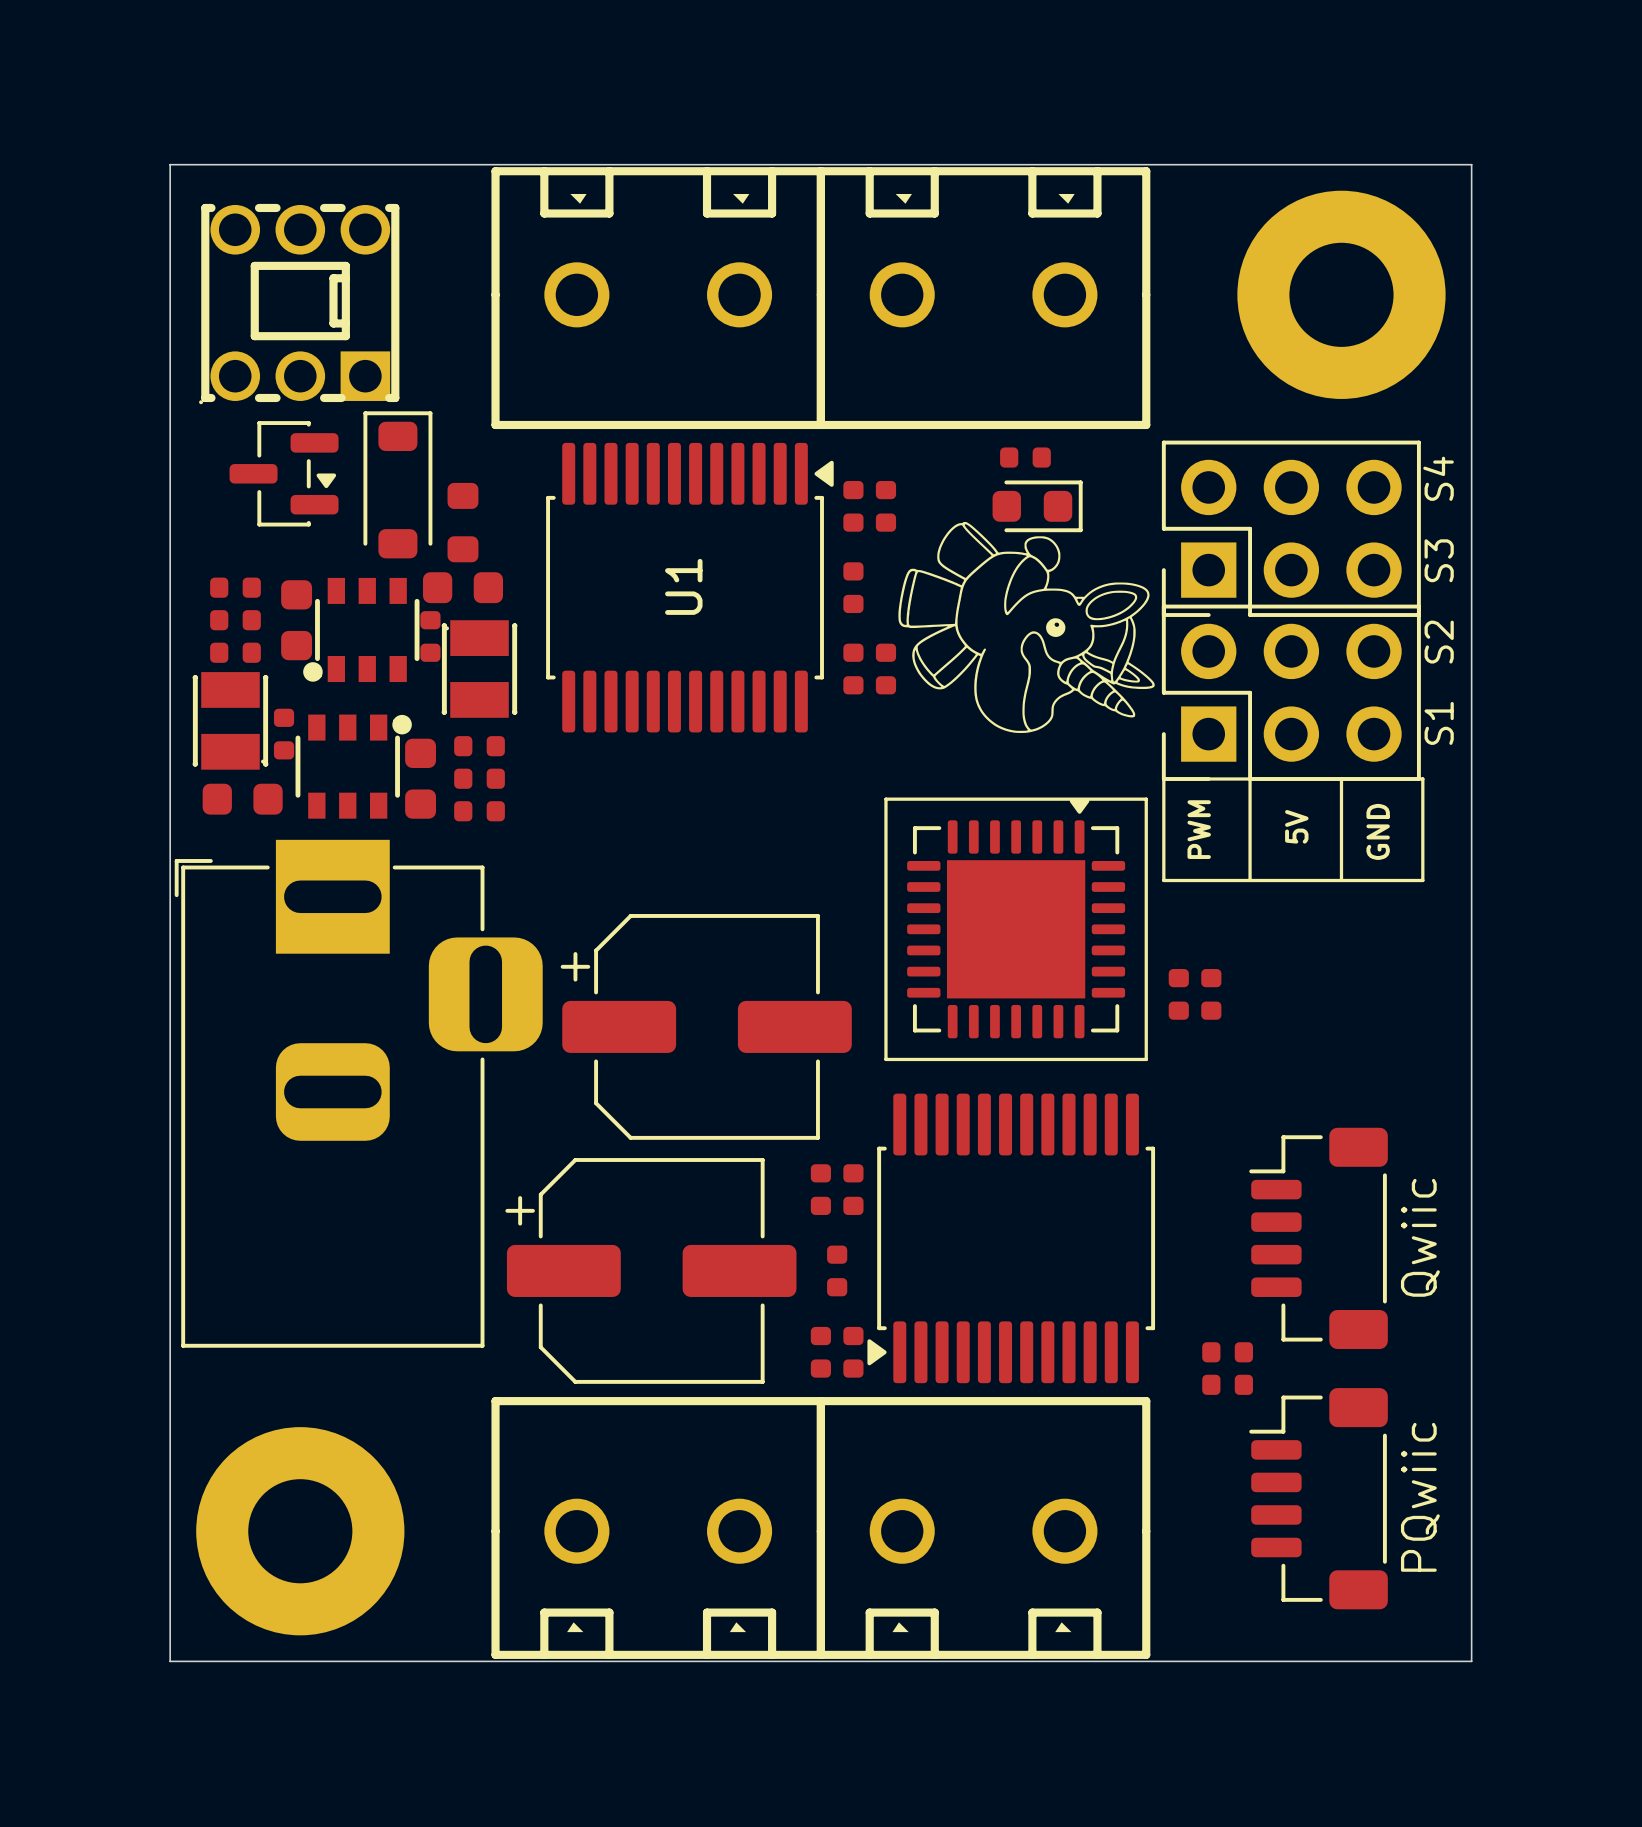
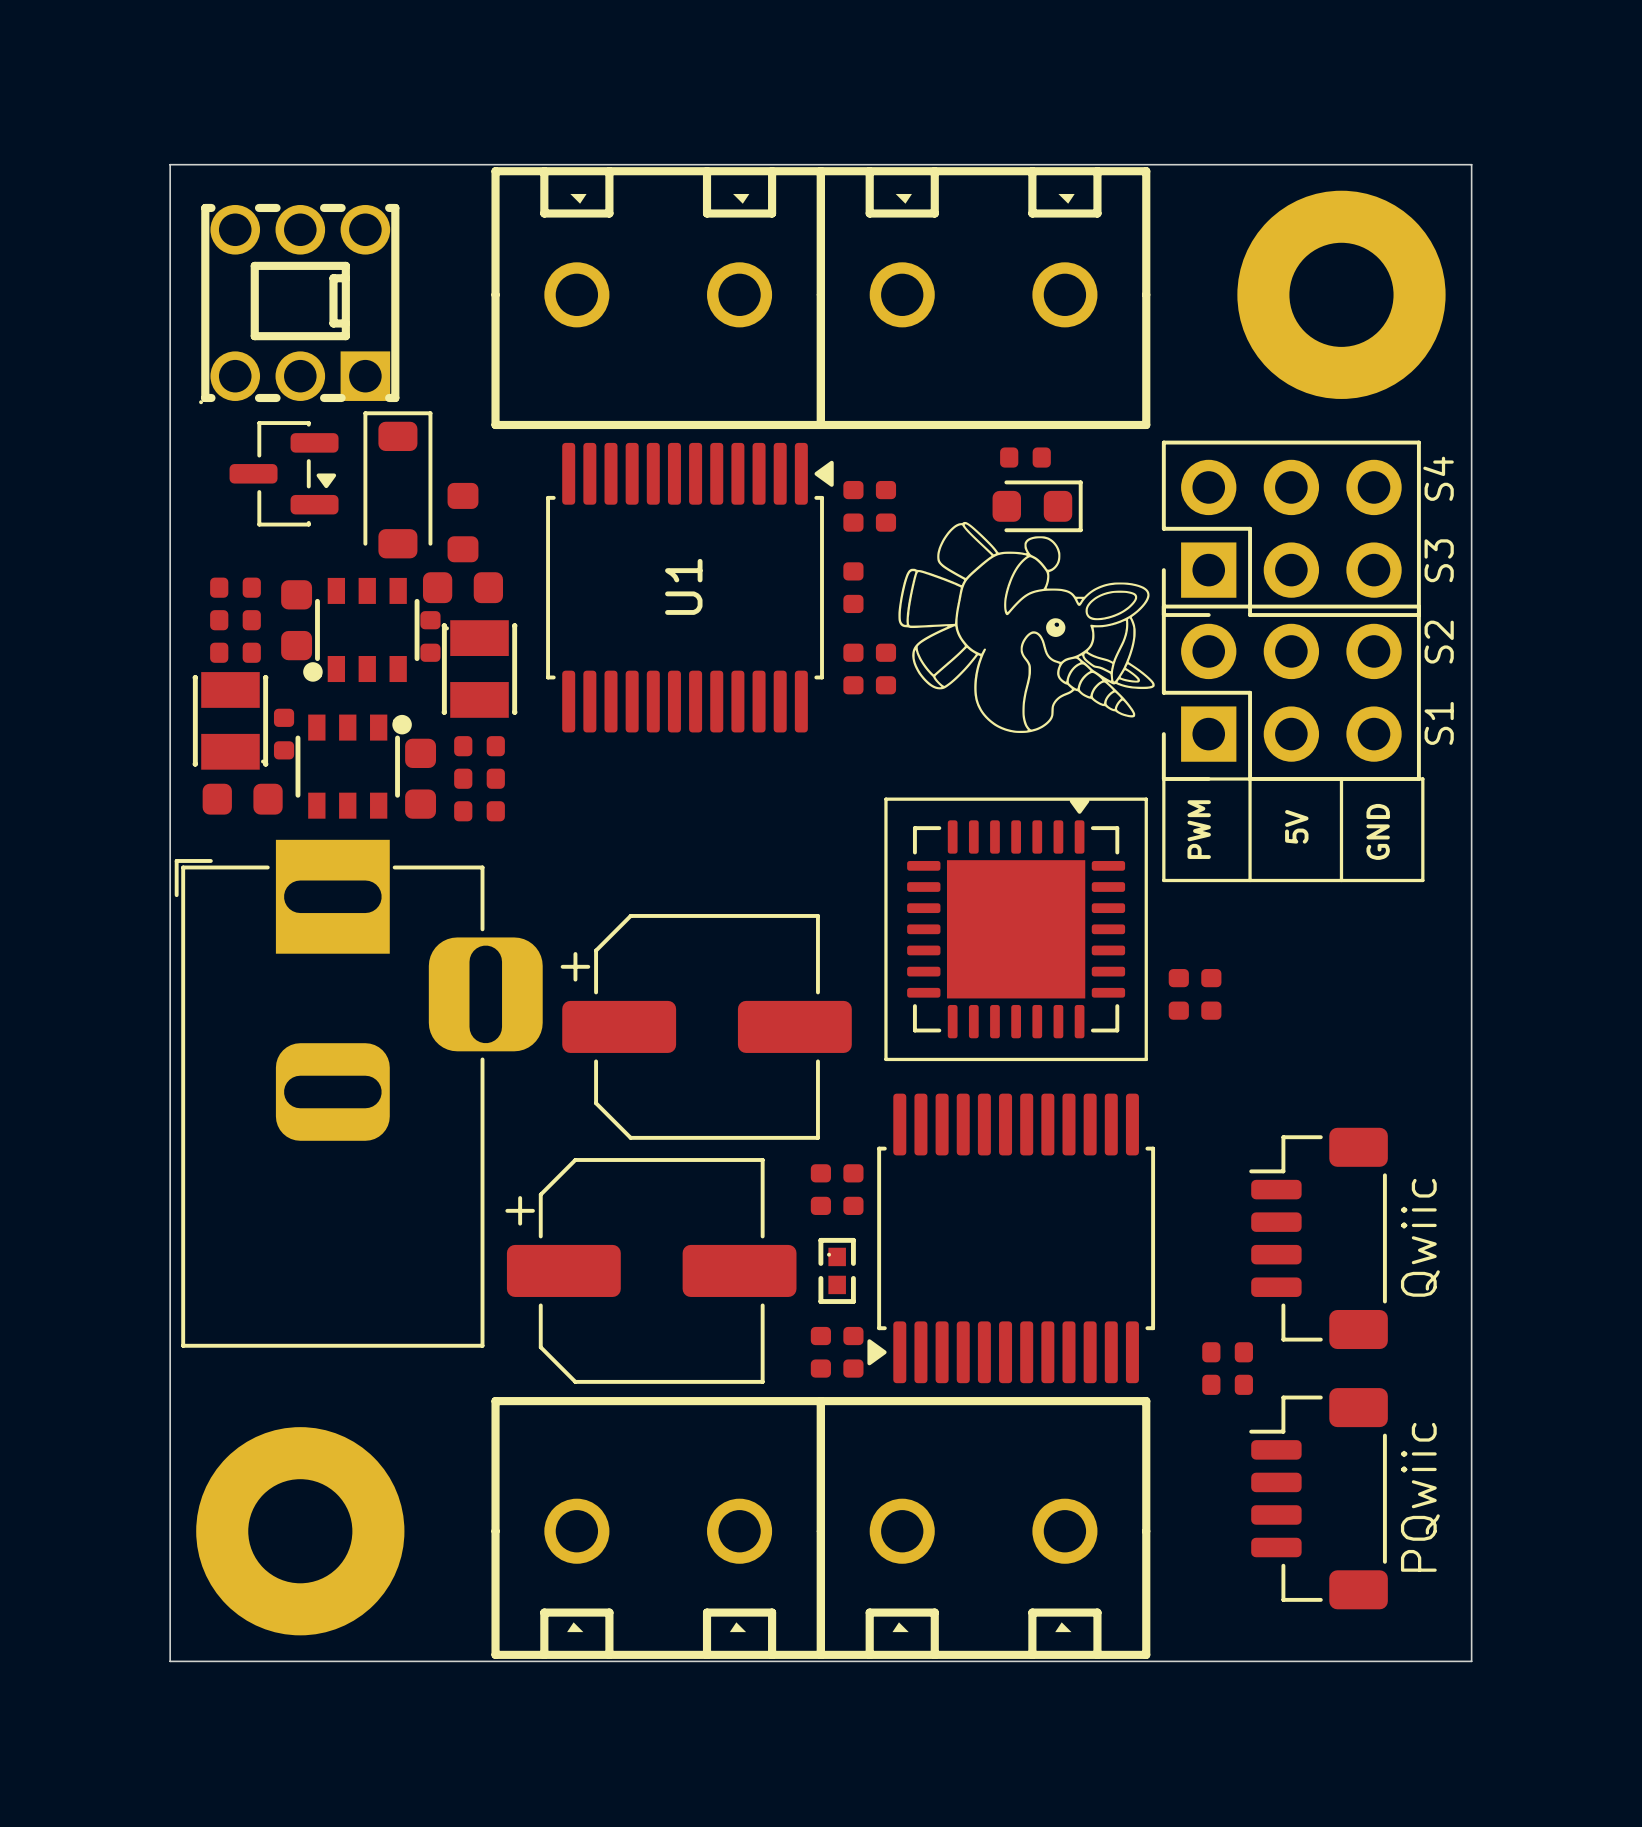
part footprint: [827, 1245, 848, 1297] -> [818, 1237, 856, 1304]

